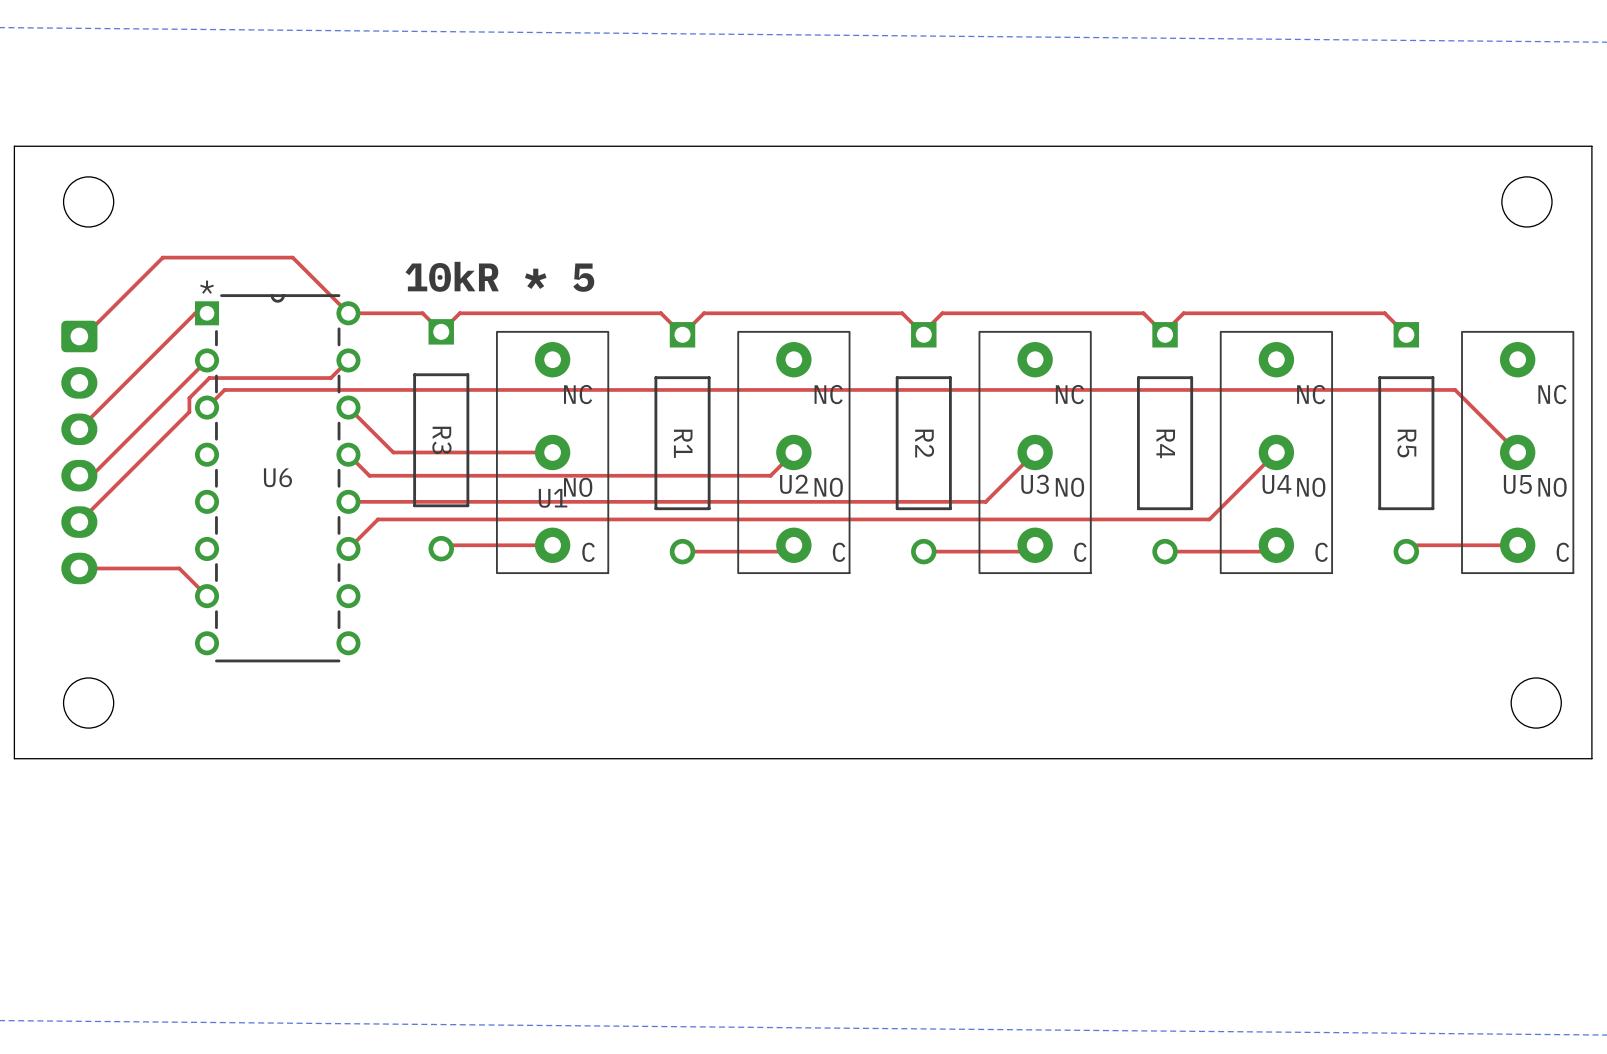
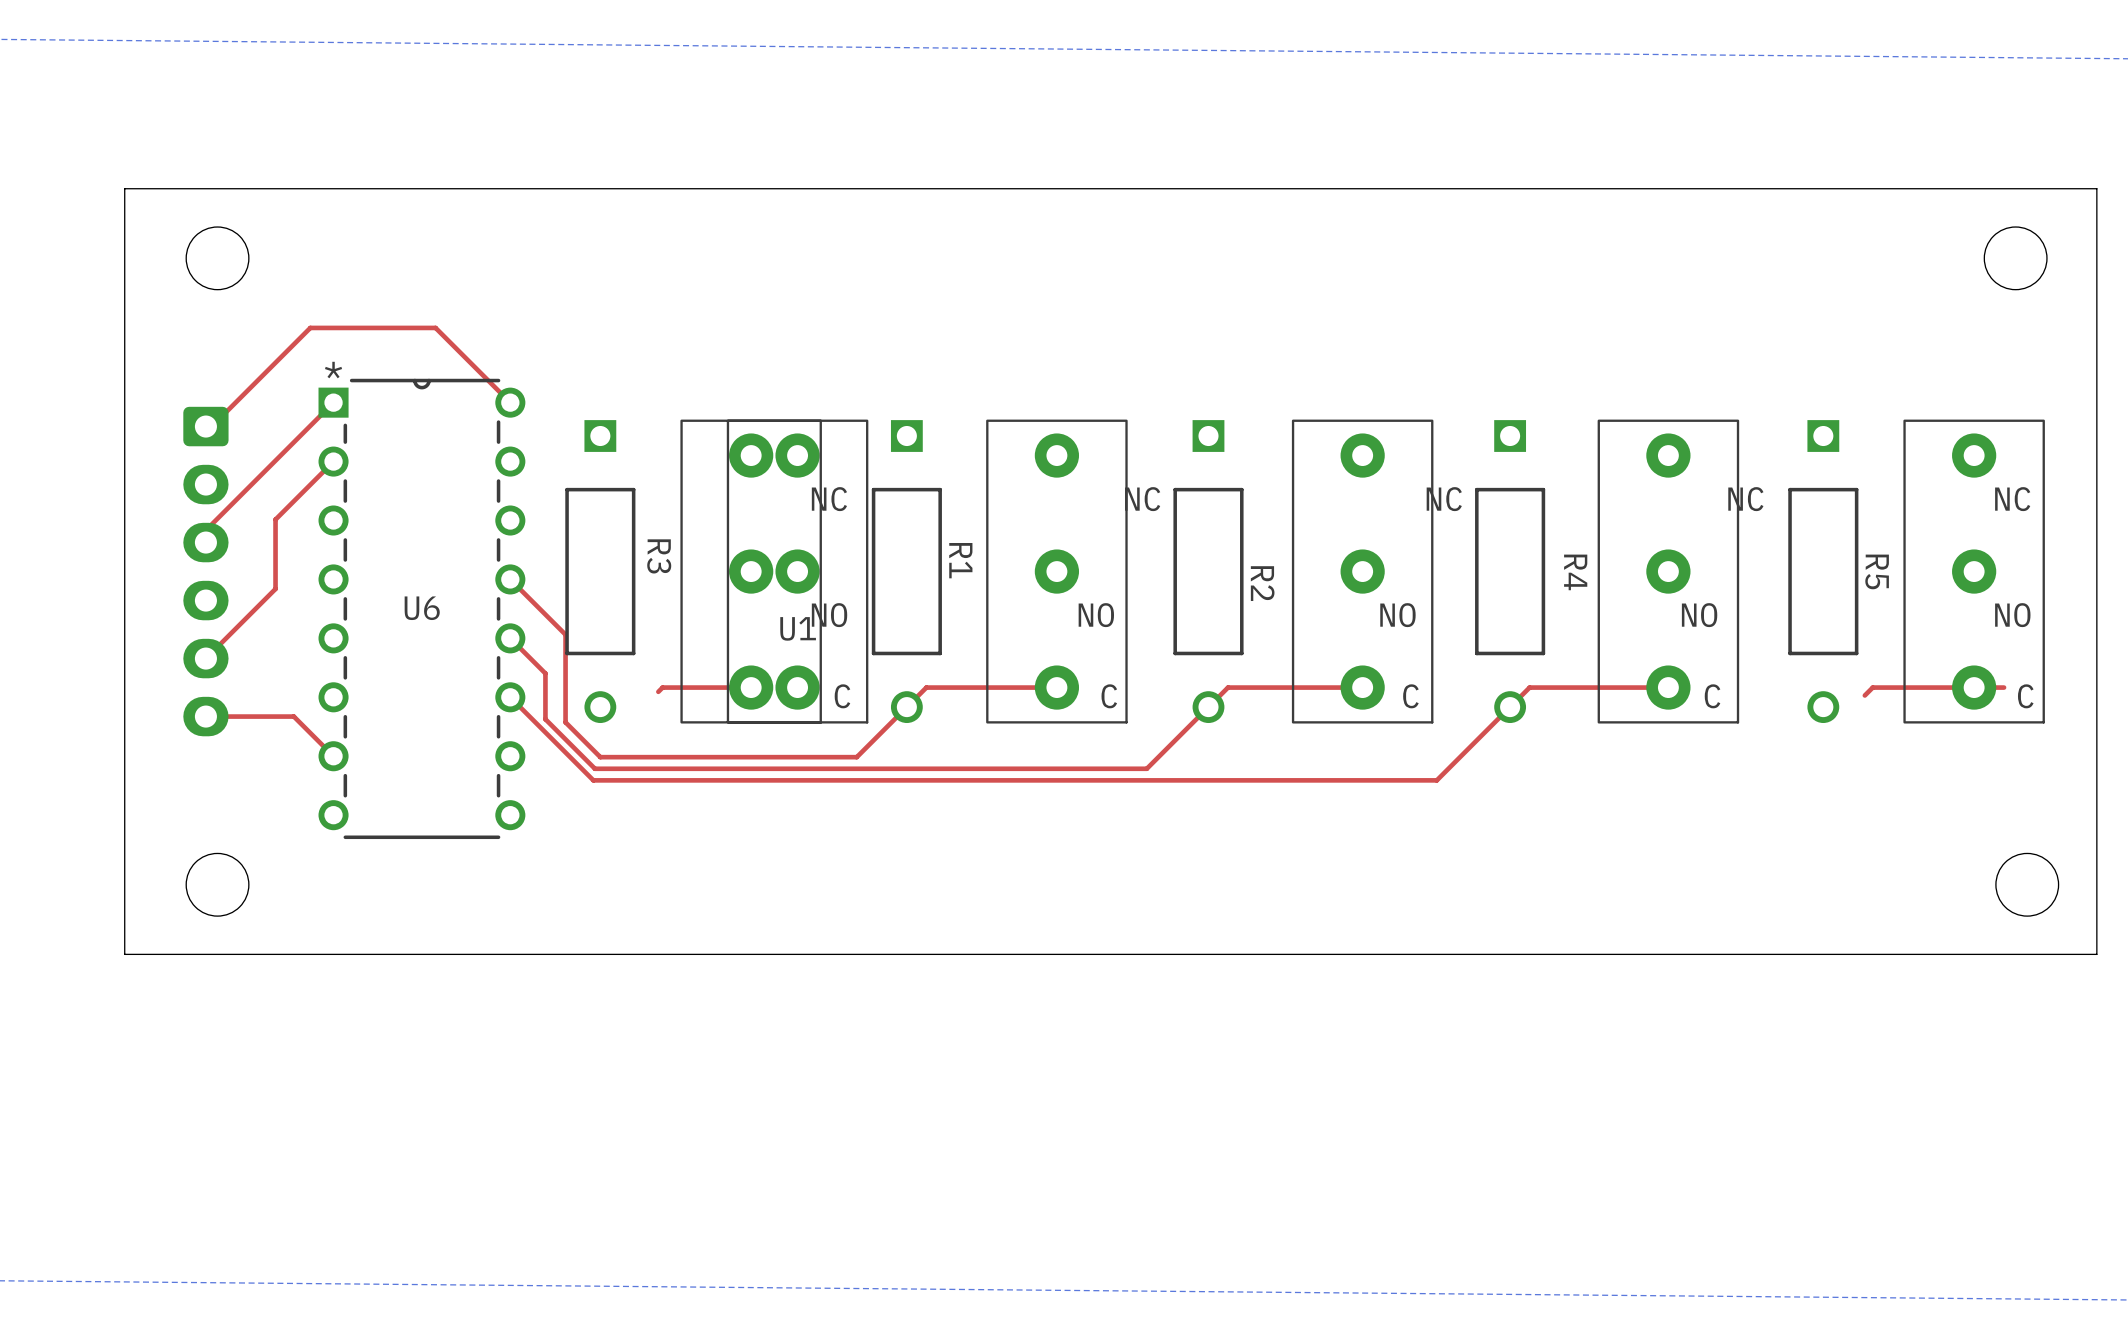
top track: (263, 257) (292, 257) (348, 313) (422, 313) (441, 331) (459, 313) (661, 313) (682, 334) (704, 313) (902, 313) (923, 334) (923, 331) (942, 313) (1143, 313) (1165, 334) (1165, 331) (1183, 313) (1384, 313) (1406, 334) -> (435, 327) (510, 402)
text: 10kR * 5 (499, 276) -> none
top track: (207, 313) (195, 313) (79, 429) -> (333, 402) (205, 530) (205, 542)
top track: (207, 360) (91, 475) (79, 475) -> none
top track: (348, 360) (330, 378) (209, 378) (189, 398) (189, 412) (135, 466) -> (333, 461) (275, 519) (275, 588)
text position: NC (1552, 394) -> NC (2012, 499)
top track: (207, 407) (224, 389) (1455, 389) (1517, 452) -> none
top track: (348, 407) (393, 452) (552, 452) -> none
R3 position: (441, 440) -> (600, 571)
R1 position: (682, 443) -> (906, 571)
R2 position: (923, 443) -> (1208, 571)
R2 name position: R2 (924, 443) -> R2 (1262, 583)
R4 position: (1165, 443) -> (1510, 571)
R4 name position: R4 (1165, 443) -> R4 (1575, 572)
R5 position: (1406, 443) -> (1823, 571)
R5 name position: R5 (1406, 443) -> R5 (1877, 571)
part: none -> (751, 571)
part: none -> (1056, 571)
top track: (793, 452) (770, 475) (369, 475) (348, 454) -> none
U2: (793, 452) -> none
part: none -> (1362, 571)
top track: (1035, 452) (985, 501) (348, 501) -> none
U3: (1035, 452) -> none
part: none -> (1668, 571)
top track: (1276, 452) (1209, 519) (377, 519) (348, 548) -> none
U4: (1276, 452) -> none
part: none -> (1974, 571)
U5: (1517, 452) -> none
top track: none -> (510, 579) (565, 634) (565, 722) (600, 757) (856, 757) (926, 687) (1056, 687)
U6 position: (277, 478) -> (421, 608)
text position: NO (828, 487) -> NO (1096, 615)
text position: NO (1069, 487) -> NO (1397, 615)
text position: NO (1311, 487) -> NO (1699, 615)
text position: NO (1552, 487) -> NO (2012, 615)
top track: none -> (510, 649) (510, 638) (545, 673) (545, 719) (594, 768) (1146, 768) (1228, 687) (1362, 687)
top track: (515, 545) (552, 545) -> none
top track: (793, 545) (787, 551) (682, 551) -> none
top track: (1035, 545) (1028, 551) (923, 551) -> none
top track: none -> (1668, 687) (1529, 687) (1436, 780) (593, 780) (510, 697)
top track: (1276, 545) (1270, 551) (1165, 551) -> none
text position: C (839, 552) -> C (1109, 696)
text position: C (1080, 552) -> C (1410, 696)
text position: C (1321, 552) -> C (1712, 696)
text position: C (1562, 552) -> C (2025, 696)
top track: (149, 568) (179, 568) (207, 596) -> (293, 716) (333, 756)

